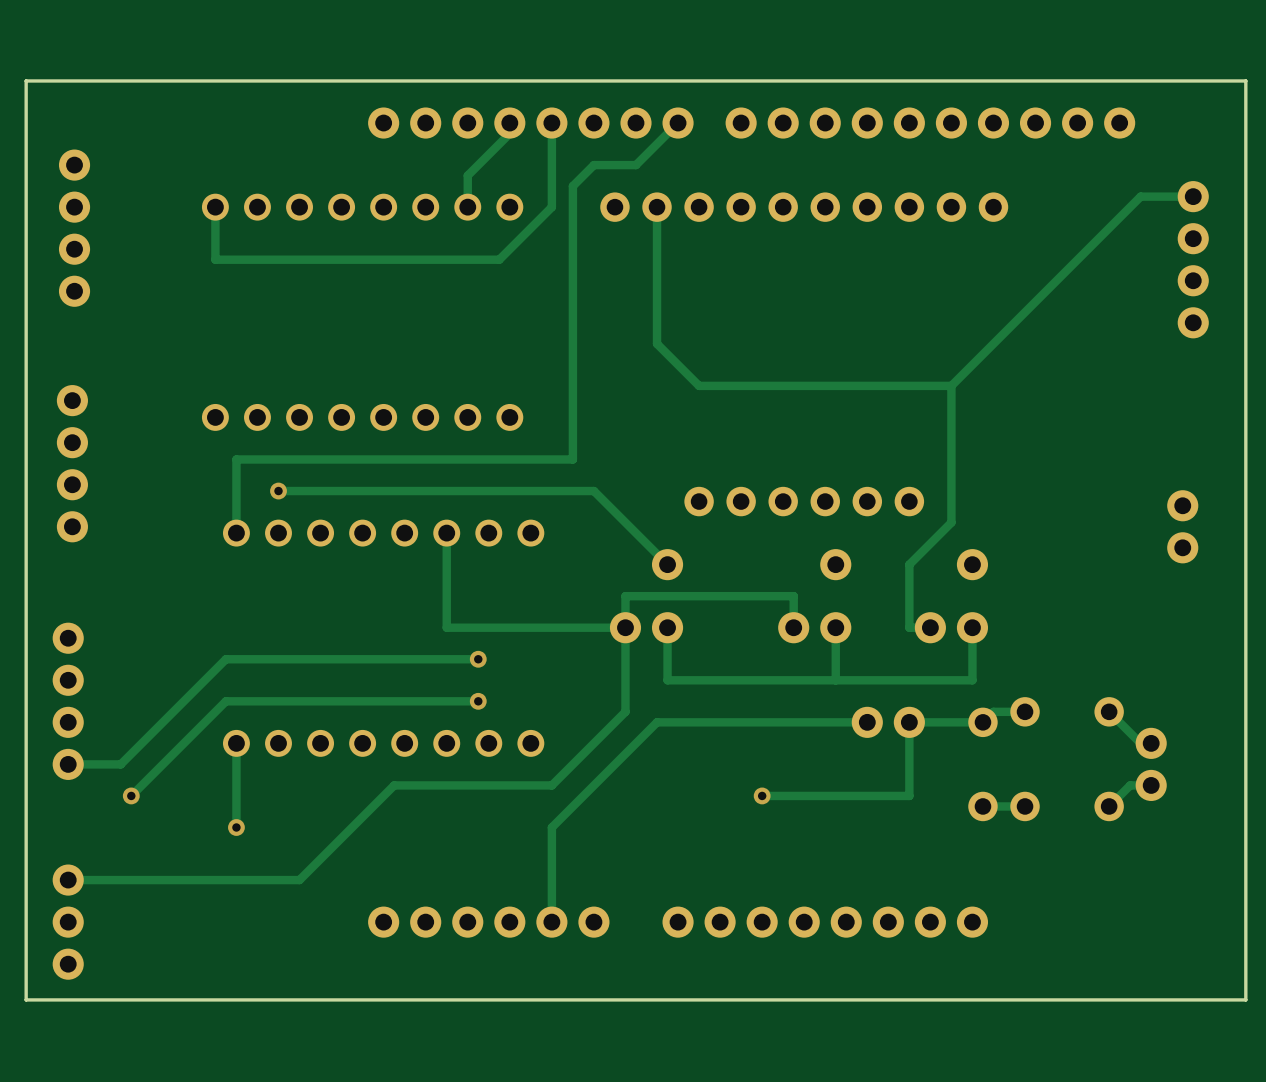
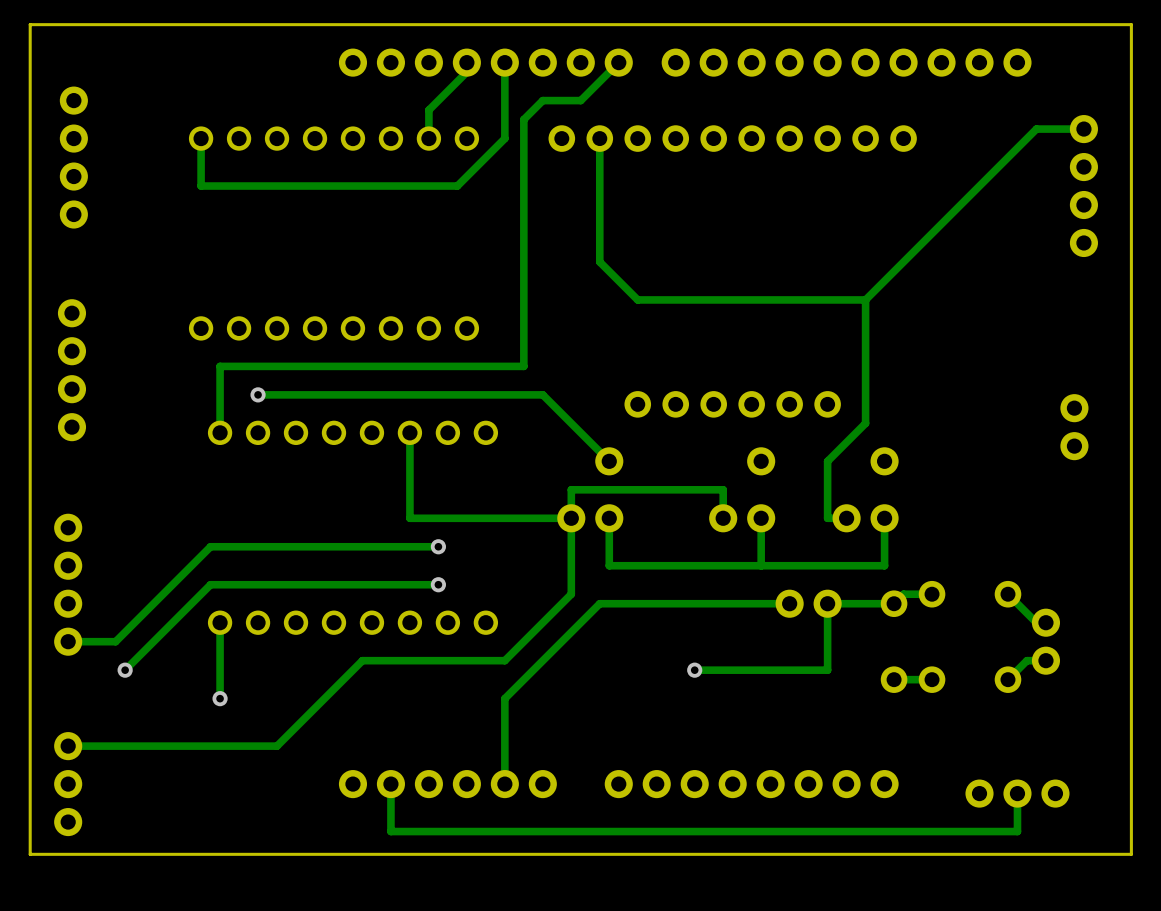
track: none -> (390, 784) (390, 831) (1017, 831) (1017, 793)
part: none -> (1017, 793)

